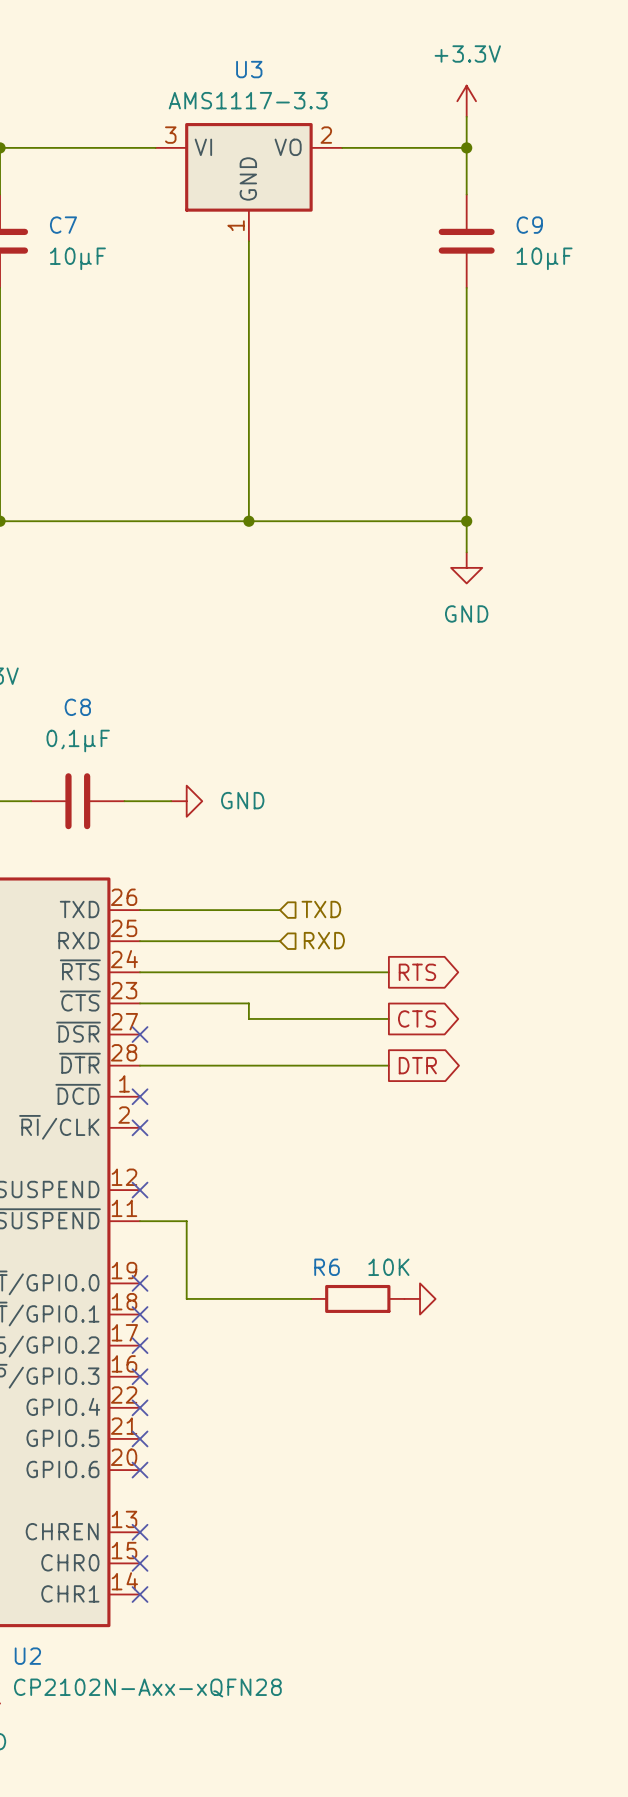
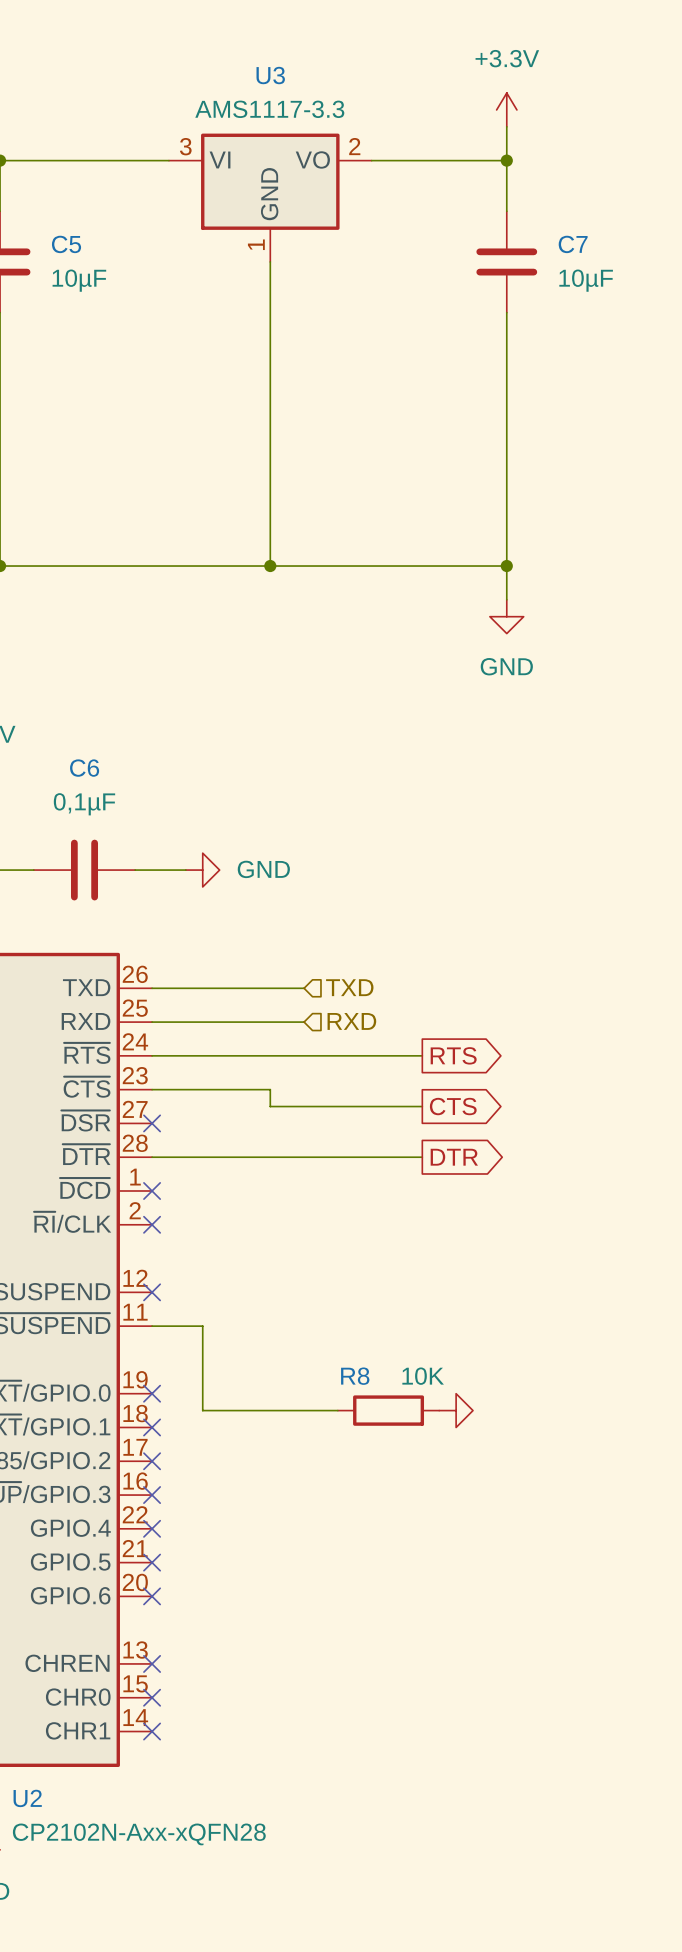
C7 name: C7 (63, 225) -> C5 (66, 244)
C9 name: C9 (529, 225) -> C7 (573, 244)
C8 name: C8 (77, 707) -> C6 (84, 768)
R6 name: R6 (327, 1267) -> R8 (355, 1376)

